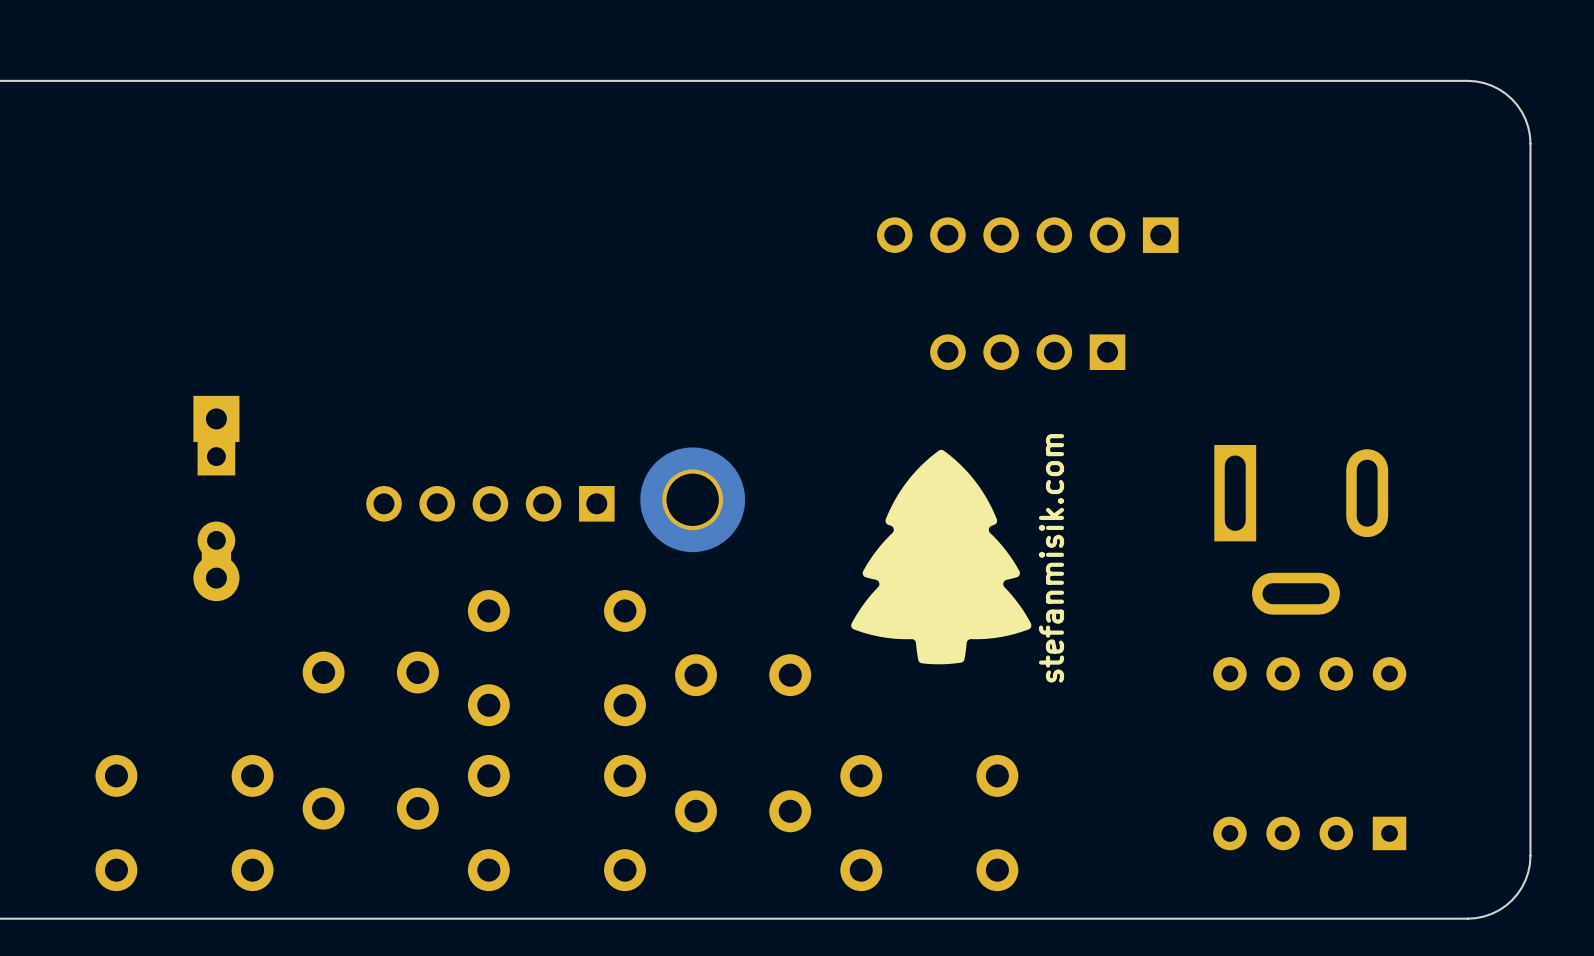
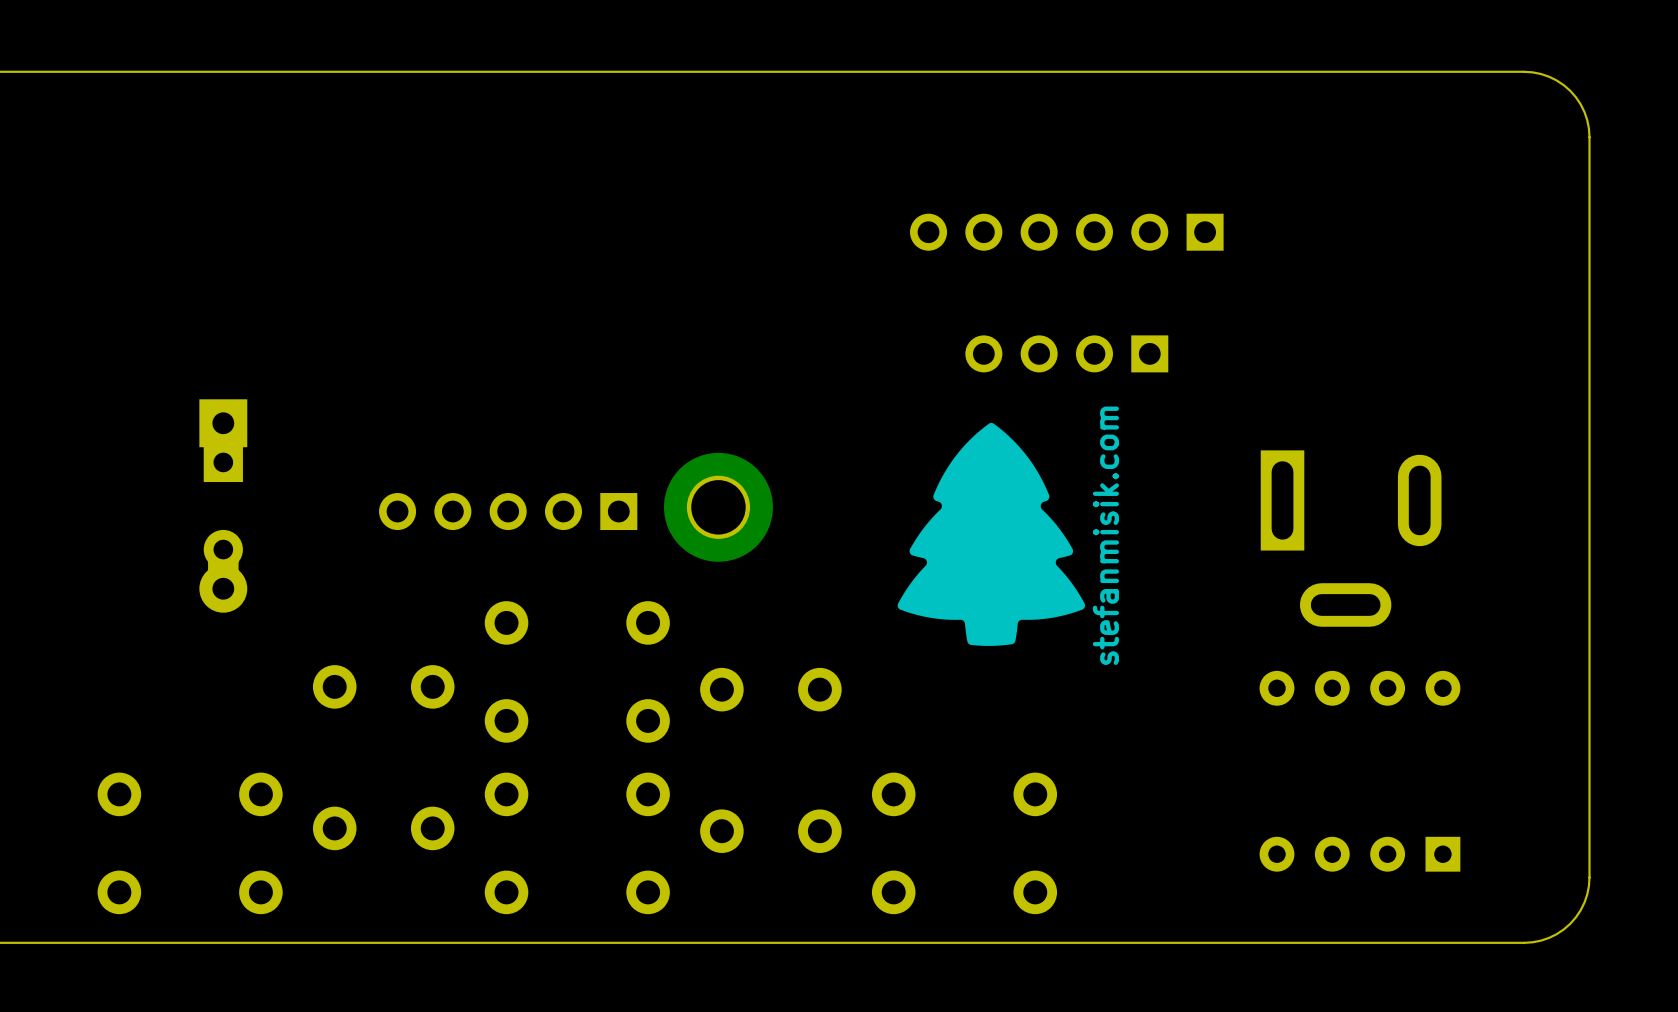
drawing position: (941, 557) -> (991, 534)
text position: stefanmisik.com (1051, 558) -> stefanmisik.com (1105, 535)

